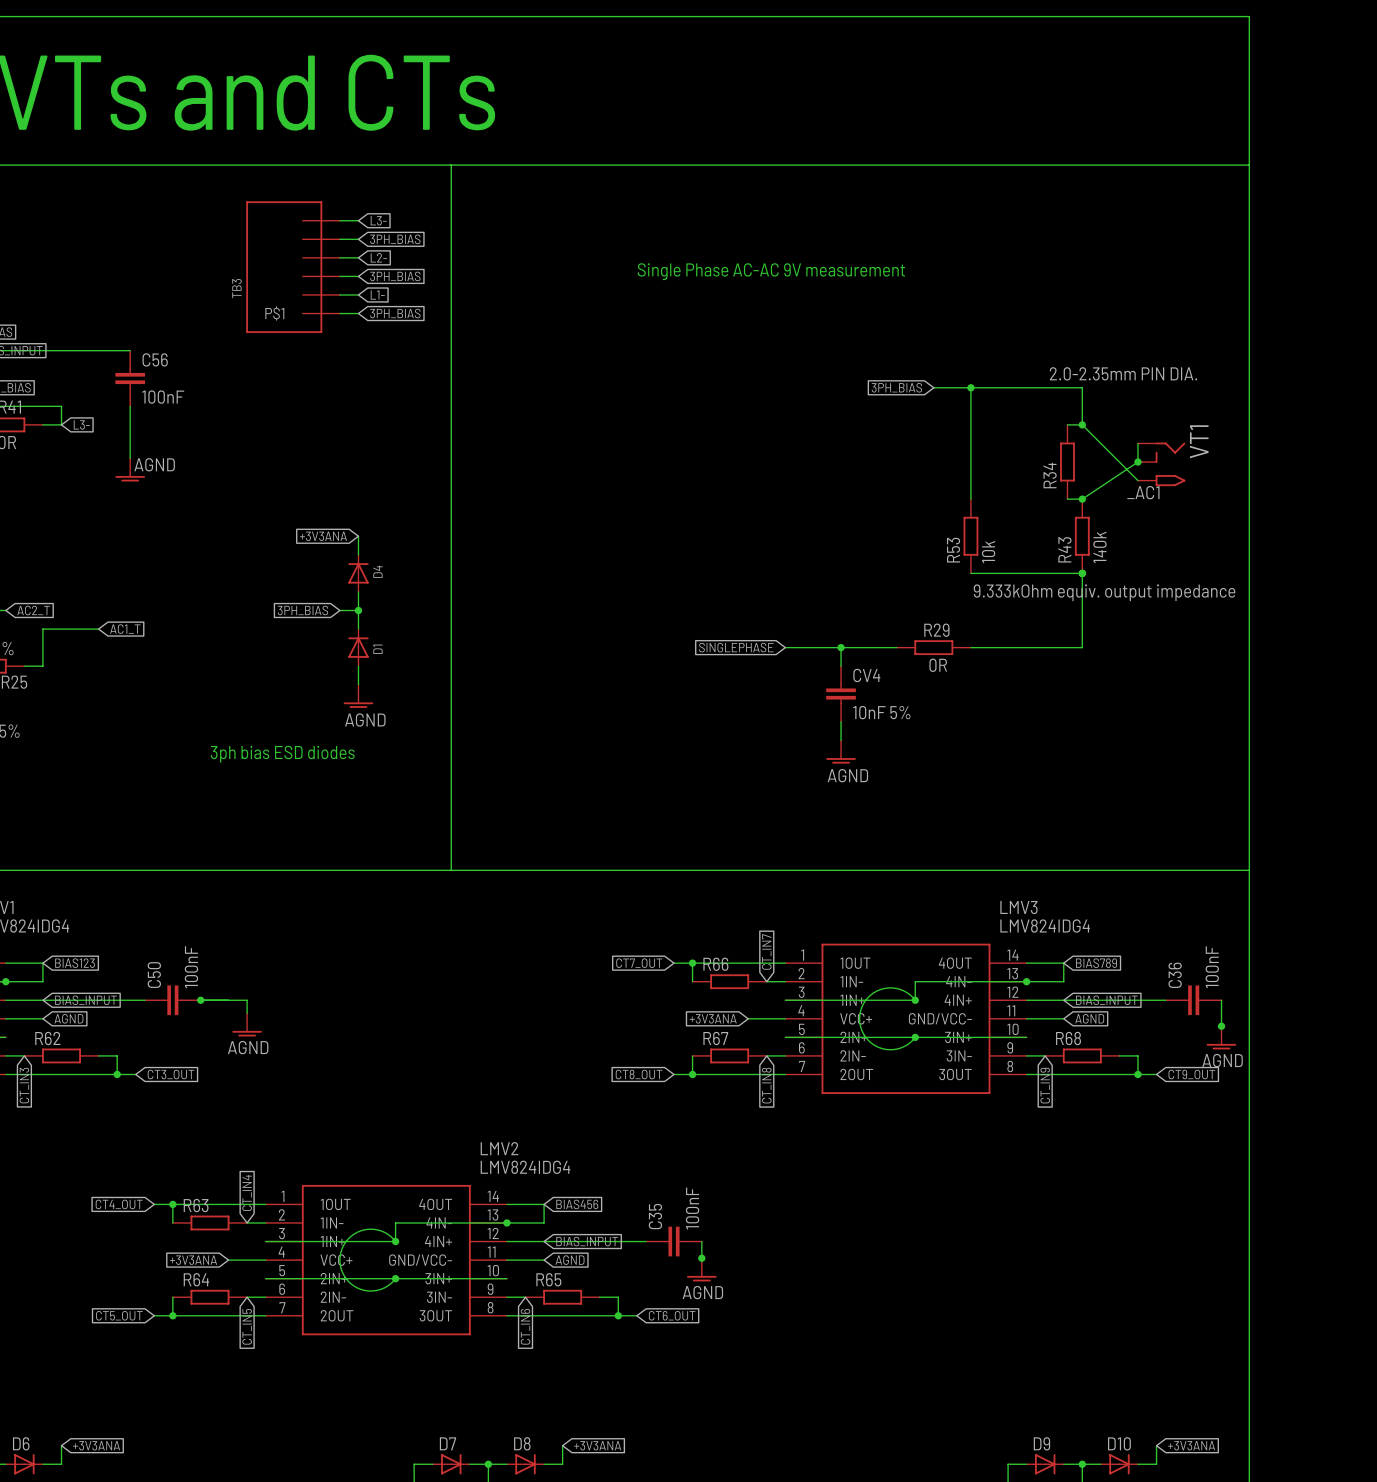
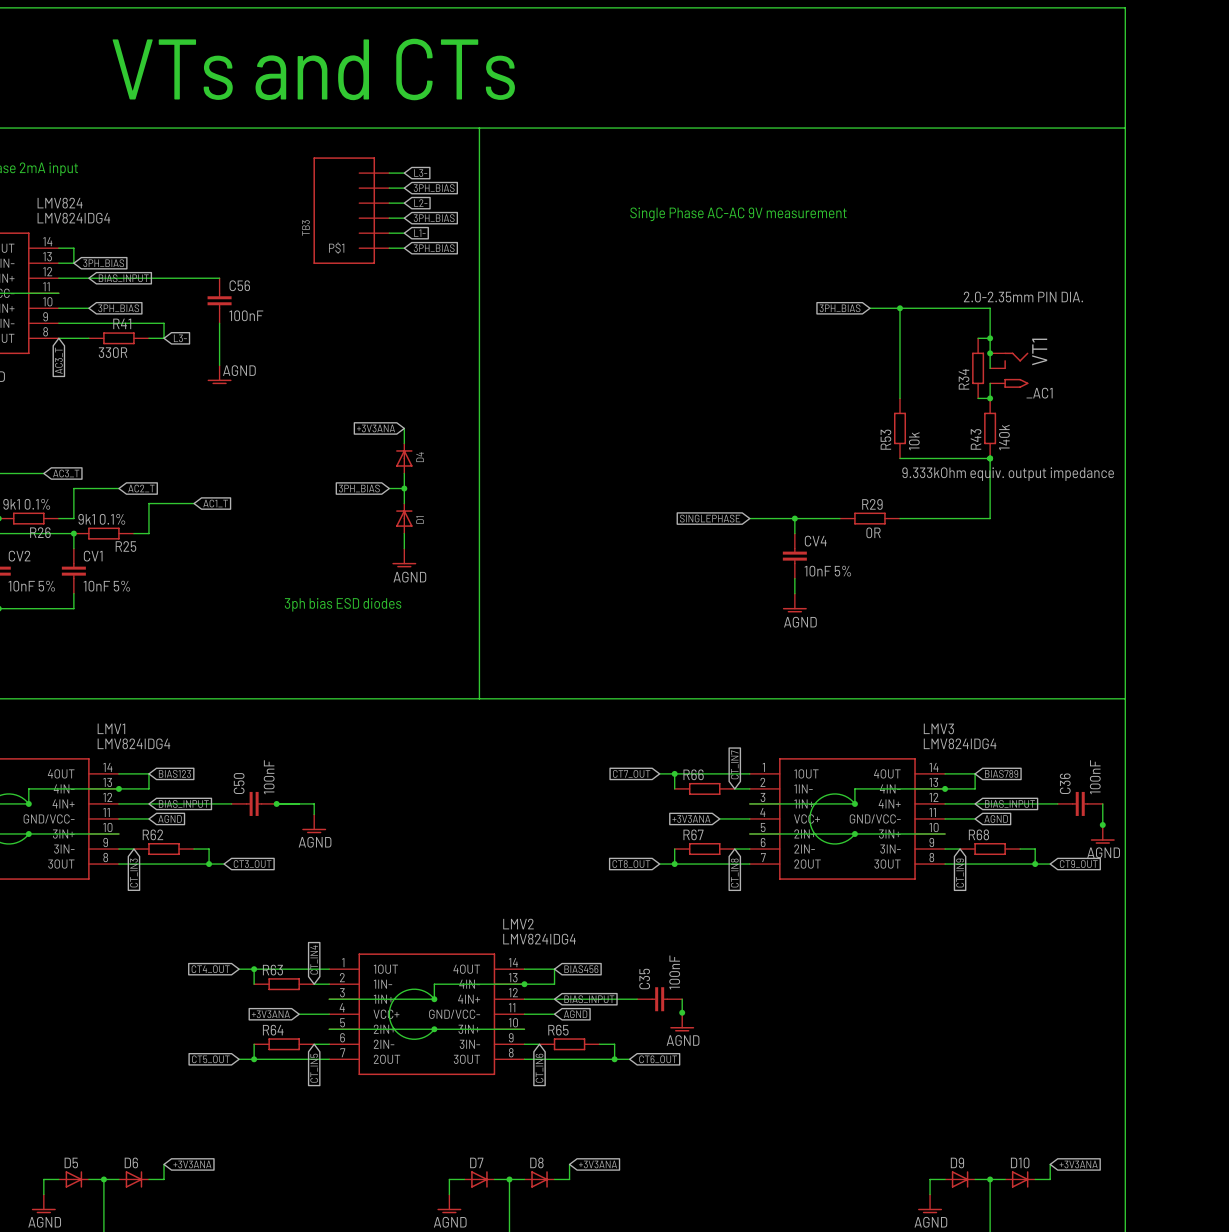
wire: (1082, 424) (1137, 480) -> (990, 338) (990, 368)
junction: none -> (990, 353)
wire: (1137, 443) (1137, 462) (1082, 499) -> (990, 383) (990, 398)
junction: (1137, 462) -> none
VT1 position: (1161, 464) -> (1009, 370)

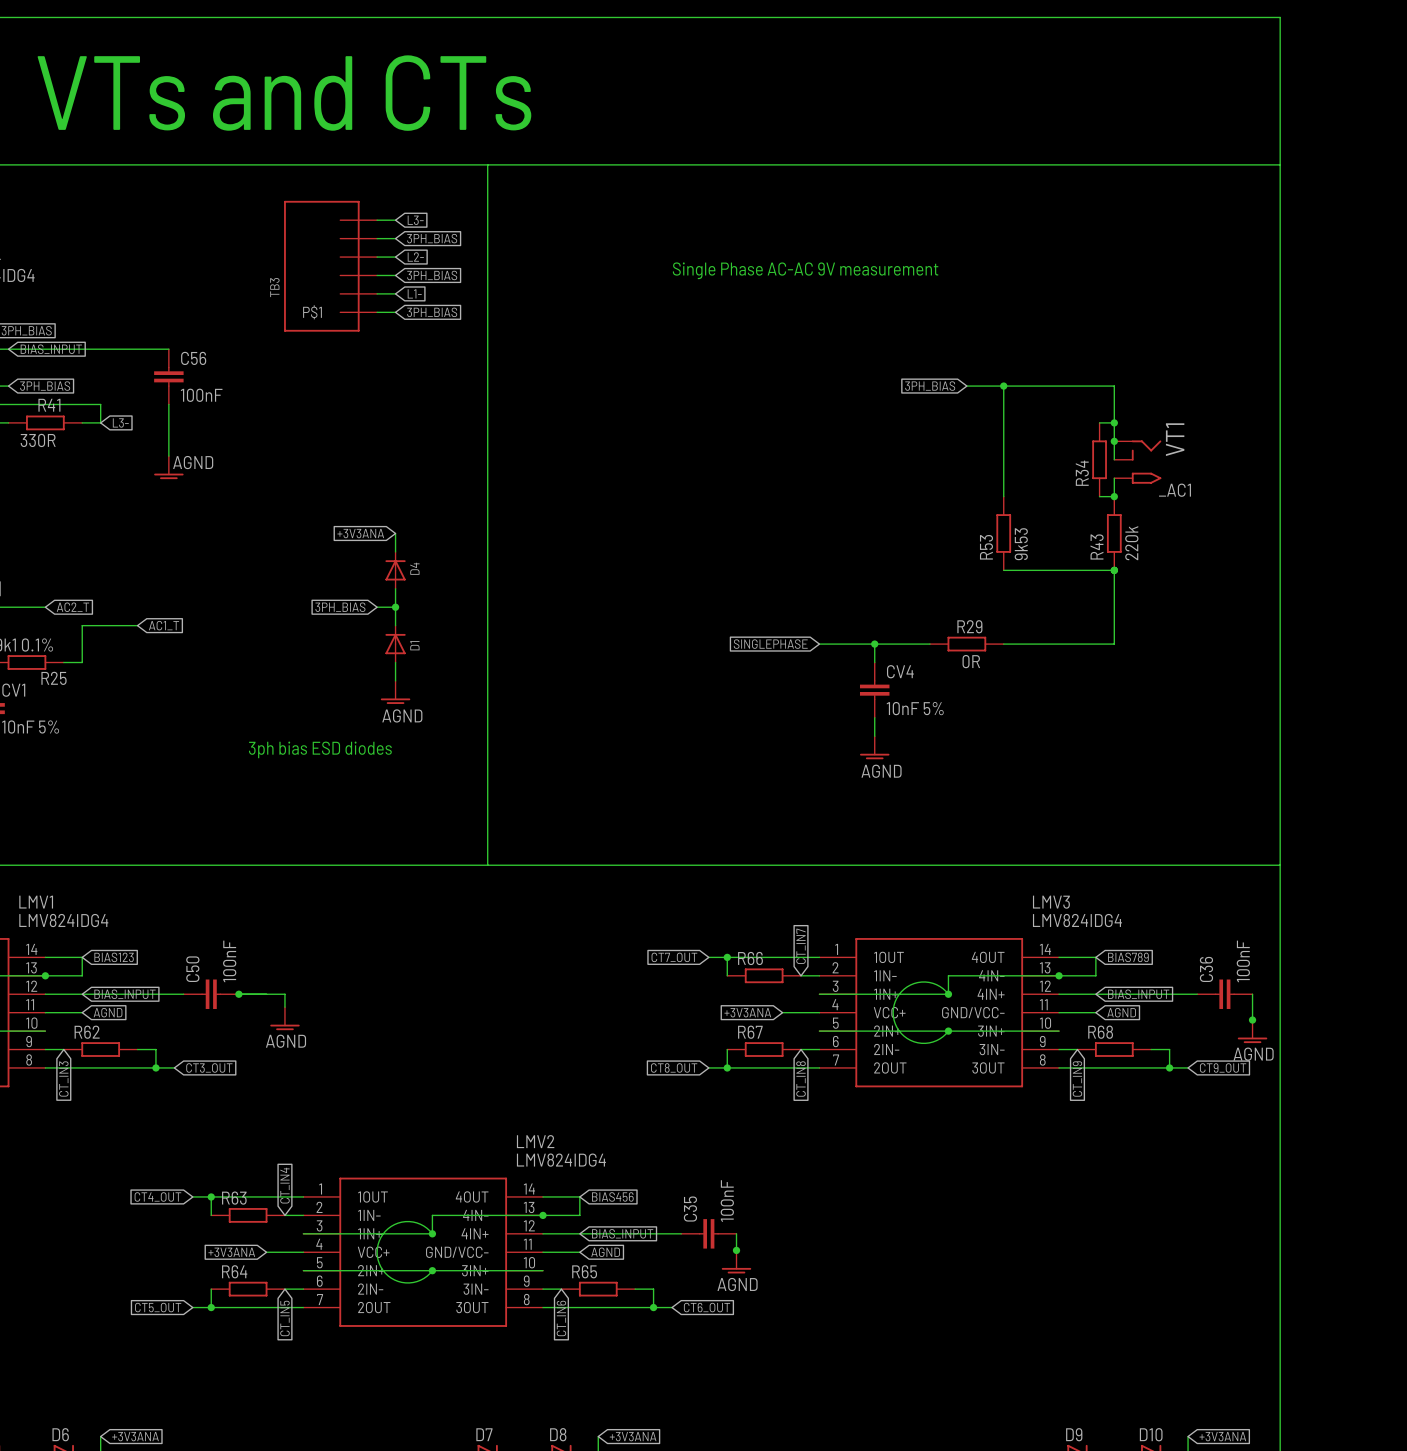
text: 2.0-2.35mm PIN DIA. (1023, 297) -> none
R43 value: 140k (1004, 437) -> 220k (1131, 543)
R53 value: 10k (914, 441) -> 9k53 (1021, 544)
text: 9.333kOhm equiv. output impedance (1008, 474) -> none

